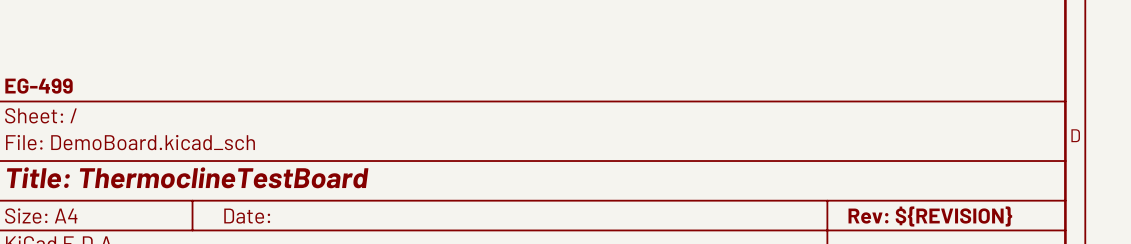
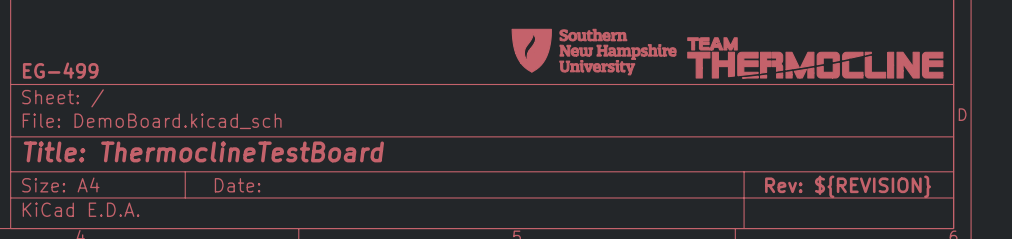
power symbol: none -> (594, 52)
power symbol: none -> (815, 57)

